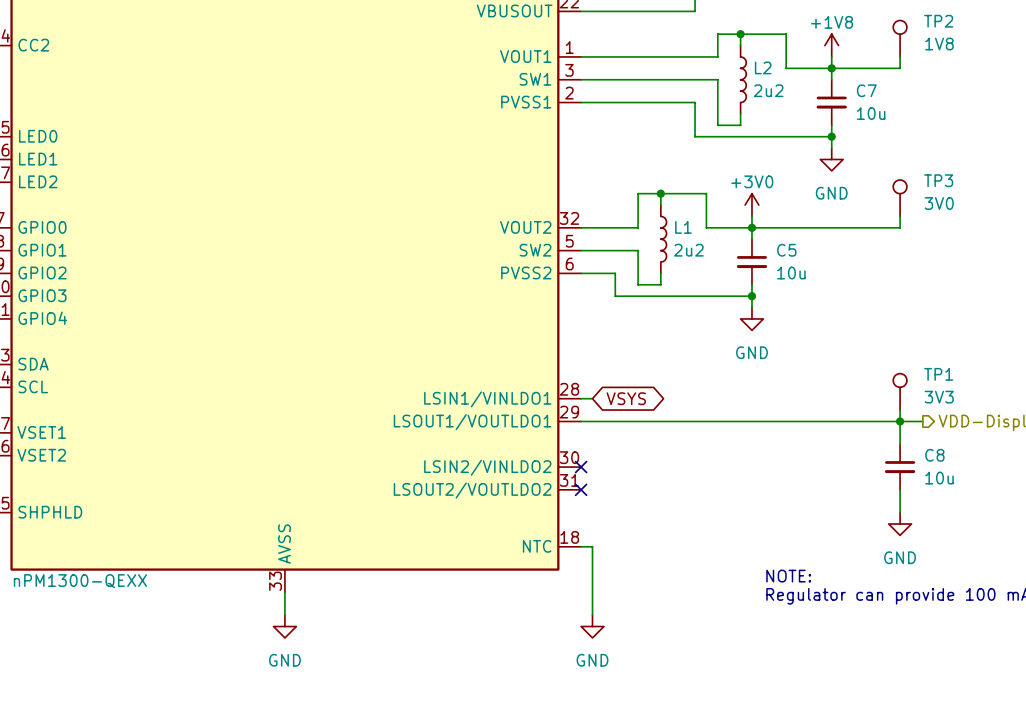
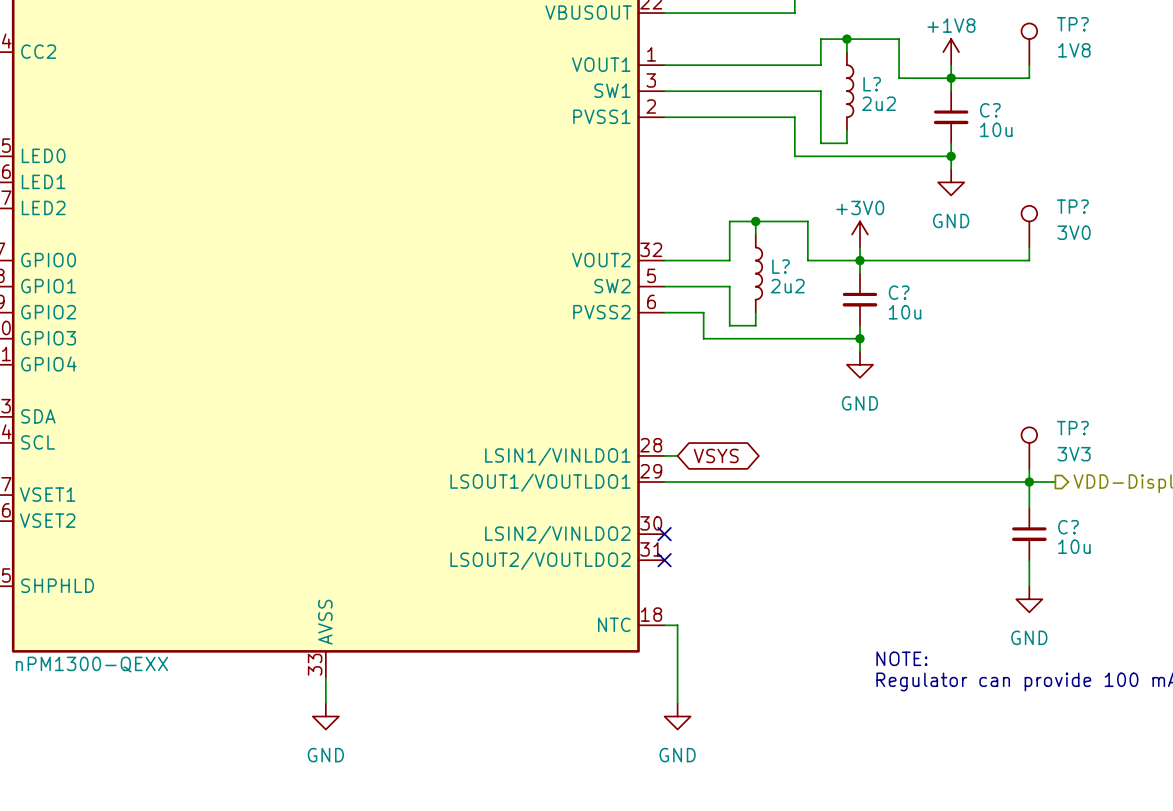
TP2 name: TP2 (938, 21) -> TP? (1072, 24)
L2 name: L2 (763, 67) -> L? (872, 84)
C7 name: C7 (866, 90) -> C? (990, 110)
TP3 name: TP3 (938, 180) -> TP? (1072, 206)
L1 name: L1 (683, 227) -> L? (780, 266)
C5 name: C5 (786, 250) -> C? (899, 292)
TP1 name: TP1 (938, 374) -> TP? (1072, 428)
C8 name: C8 (934, 455) -> C? (1068, 527)

